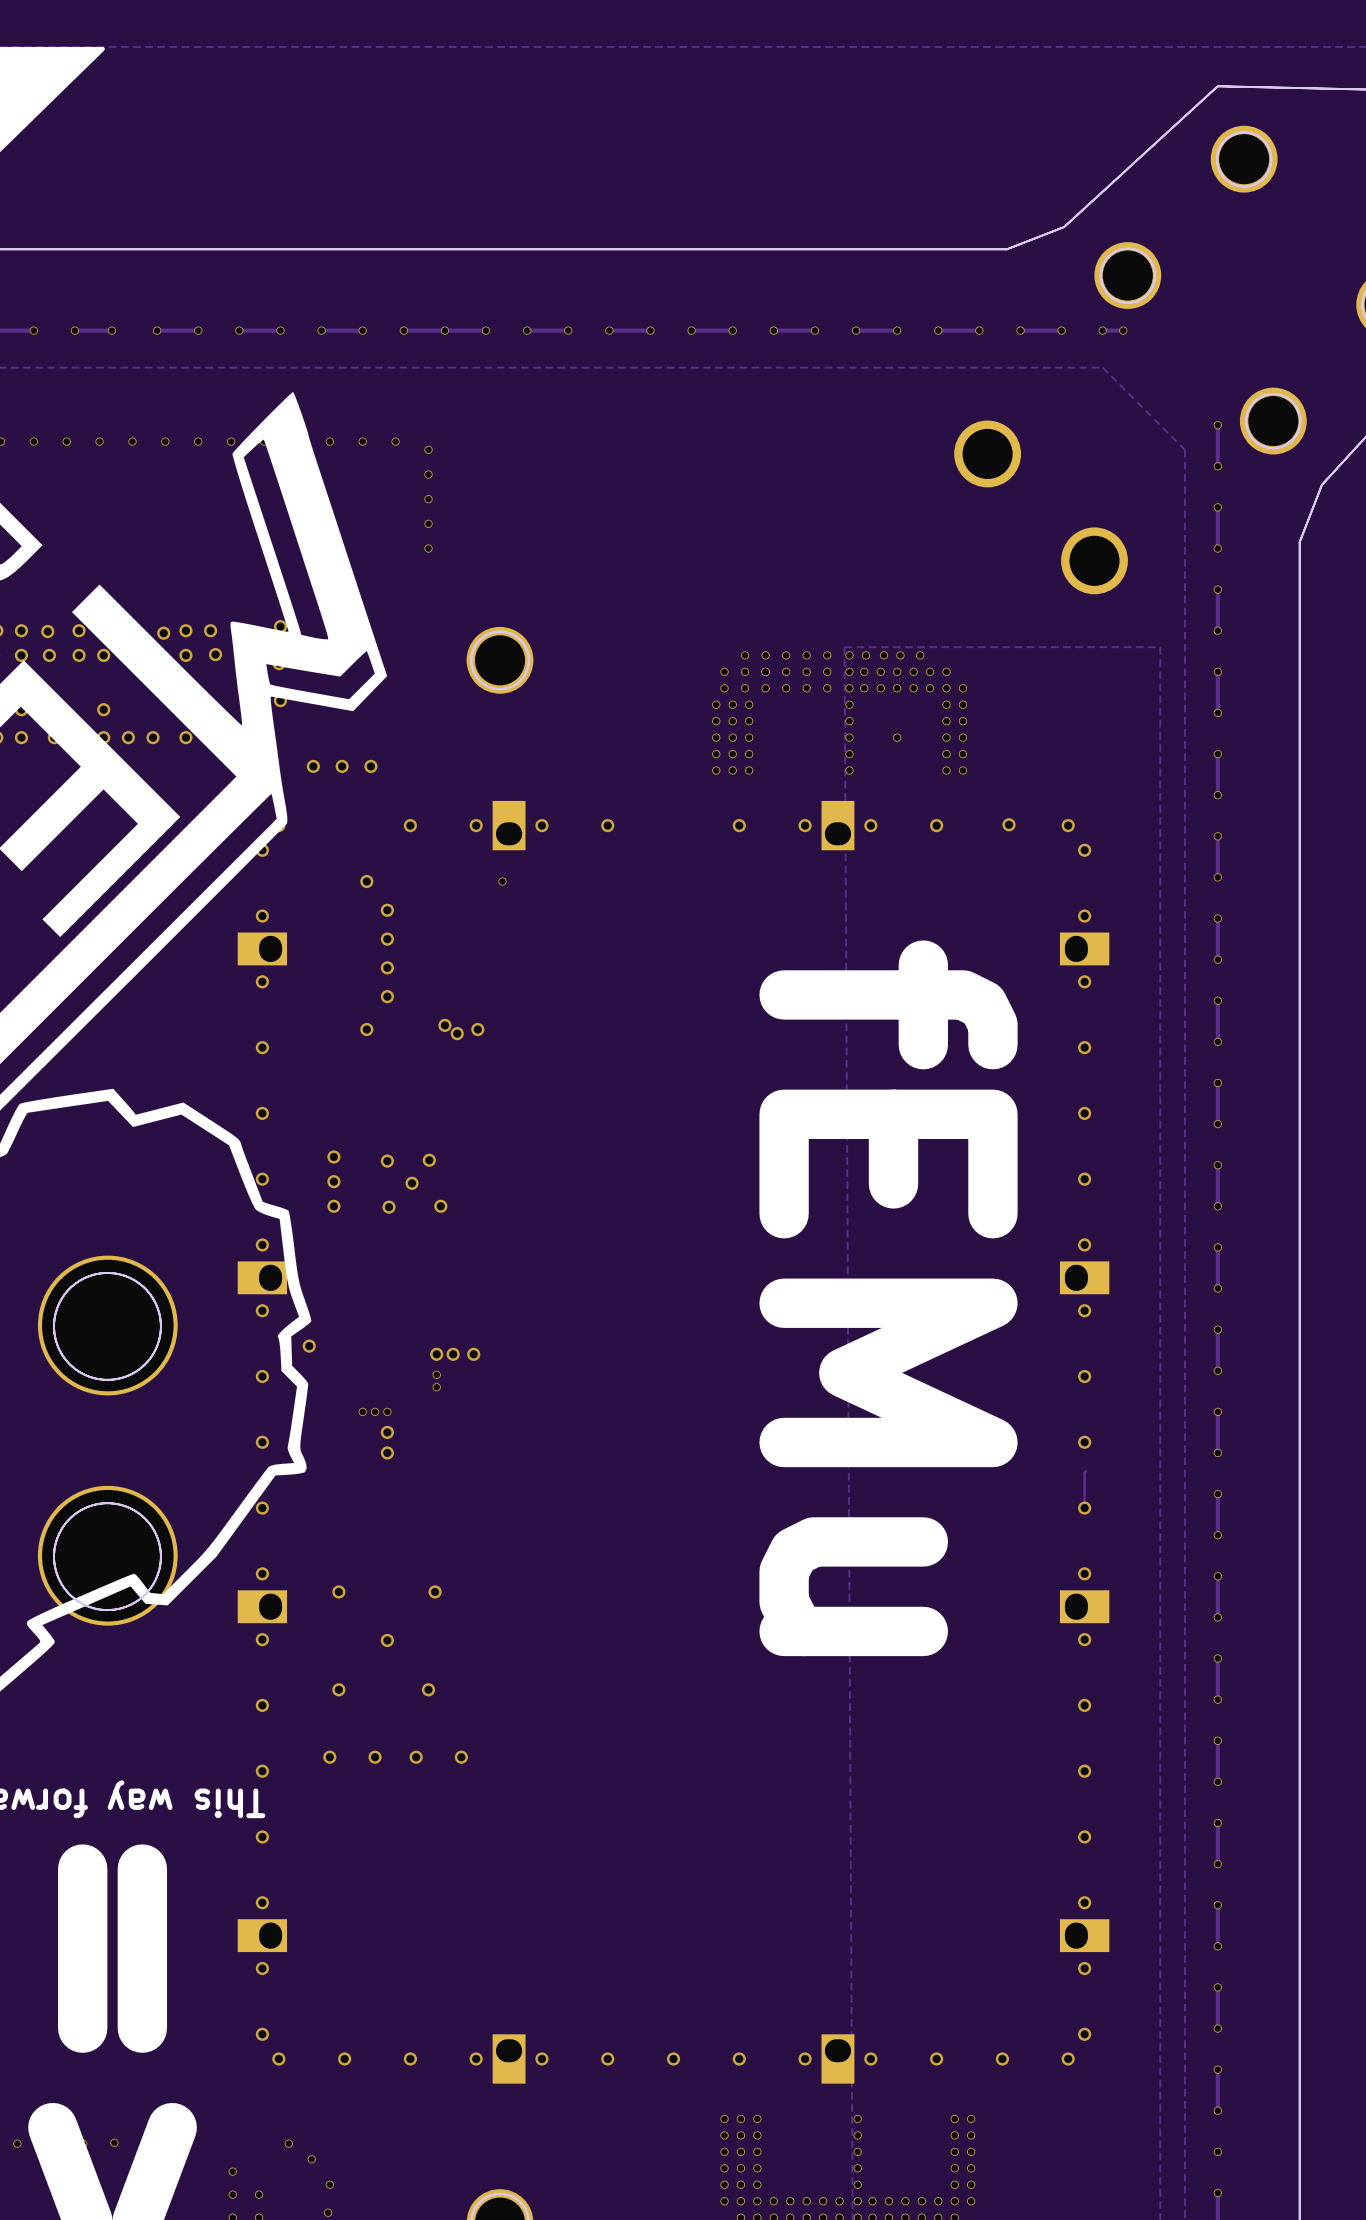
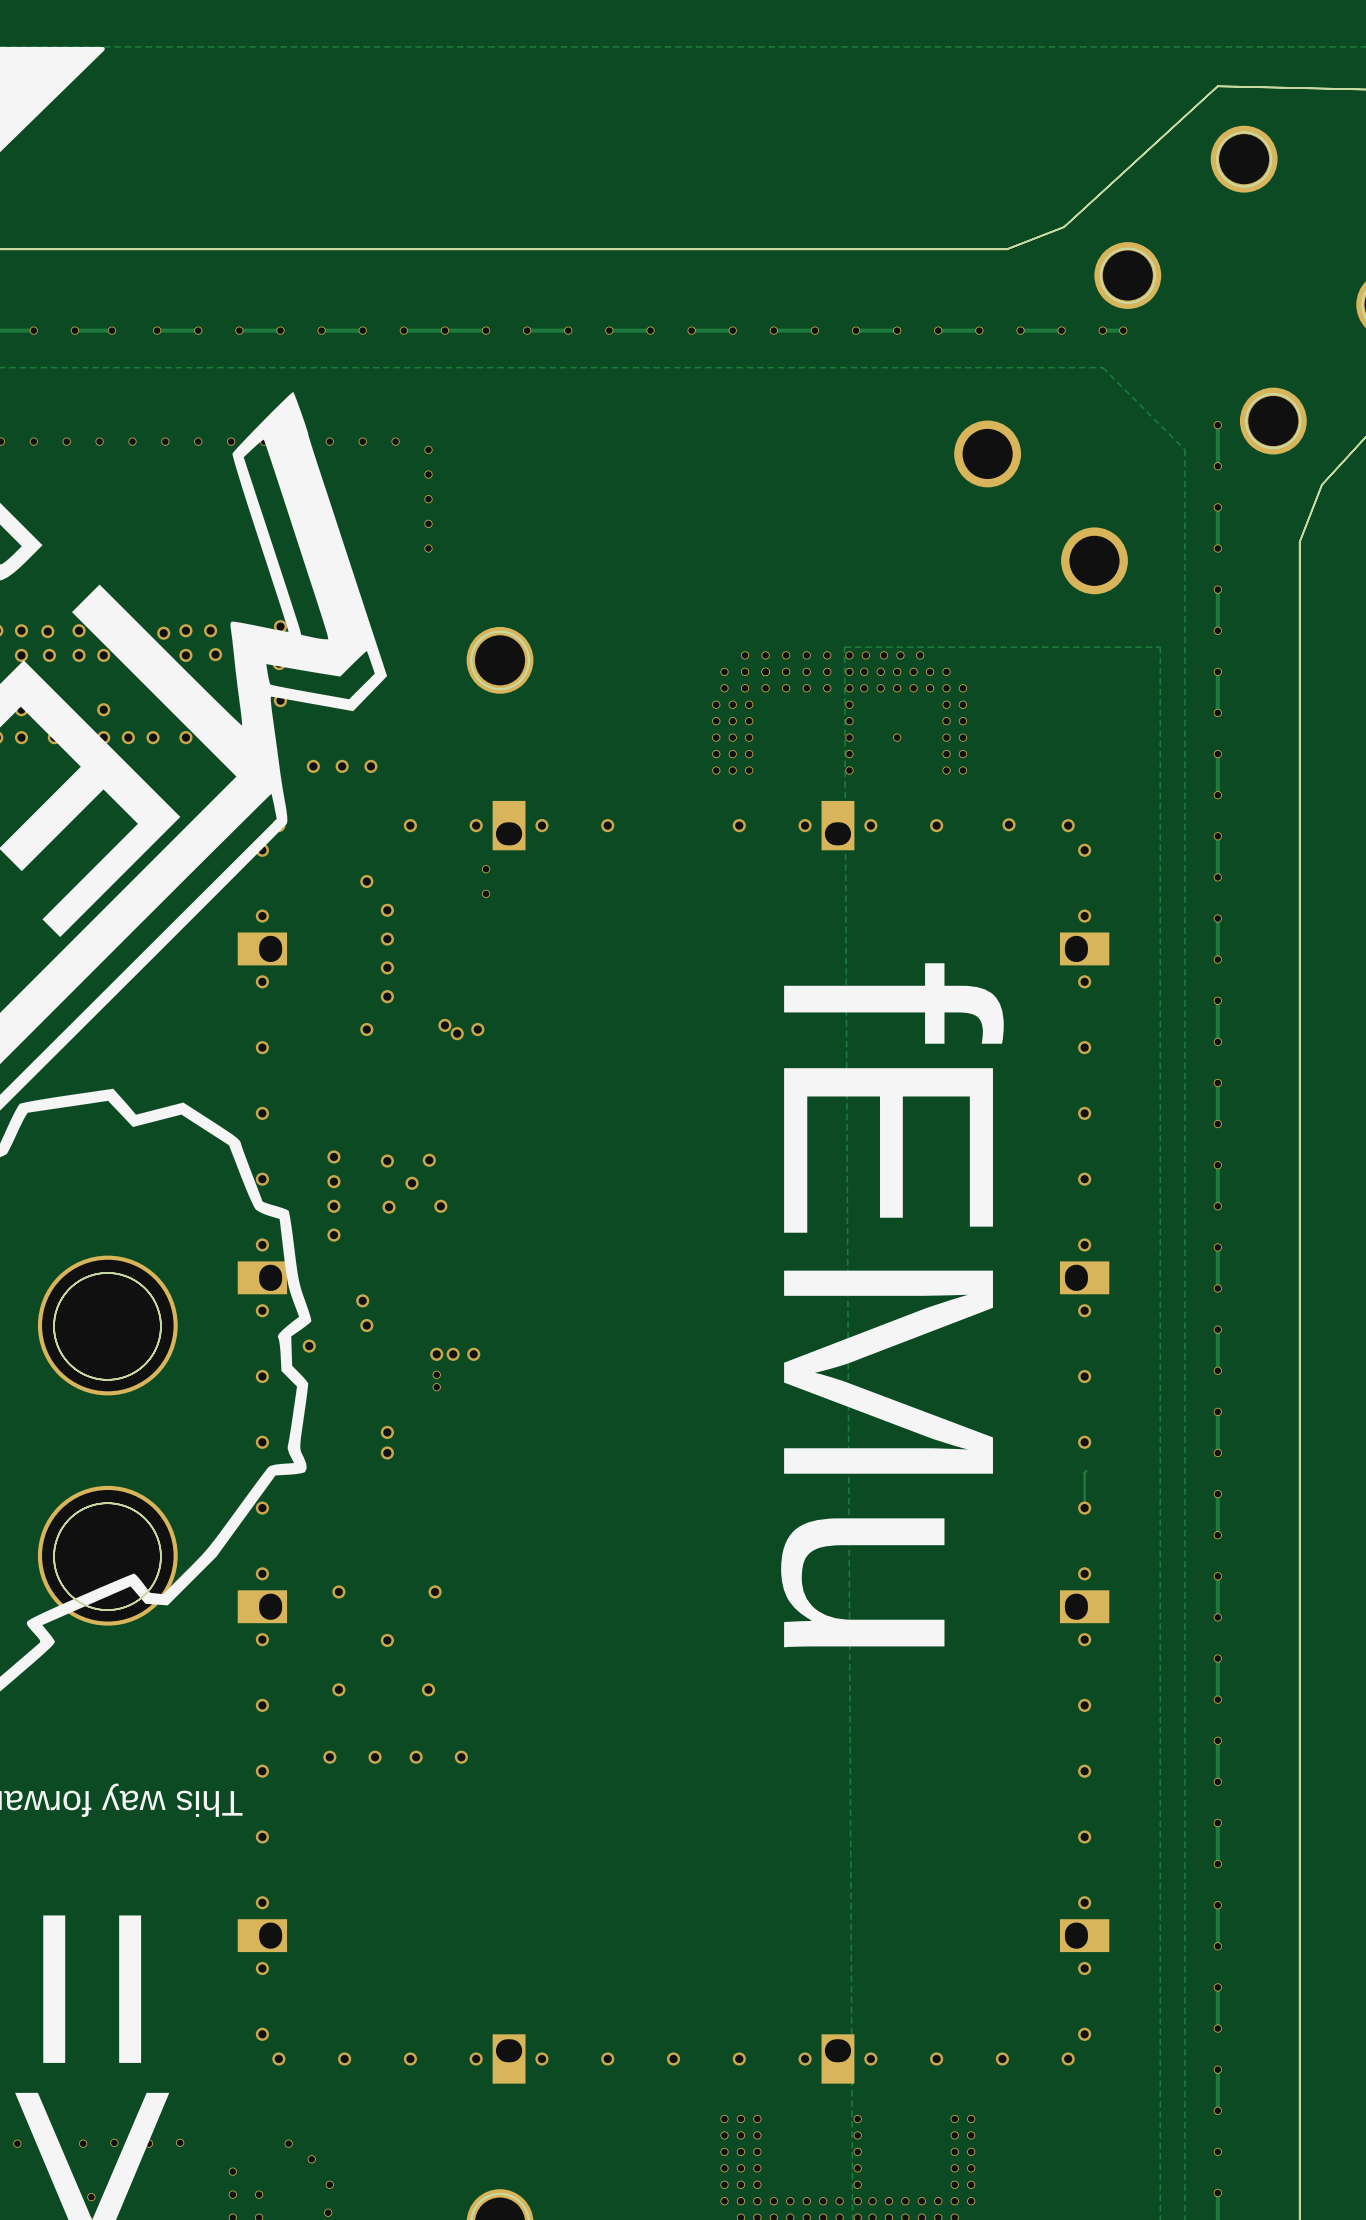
via: none -> (486, 869)
via: (502, 881) -> none
via: none -> (486, 893)
via: none -> (333, 1235)
via: none -> (362, 1300)
via: none -> (366, 1325)
via: (362, 1411) -> none
via: (375, 1411) -> none
via: (387, 1411) -> none

